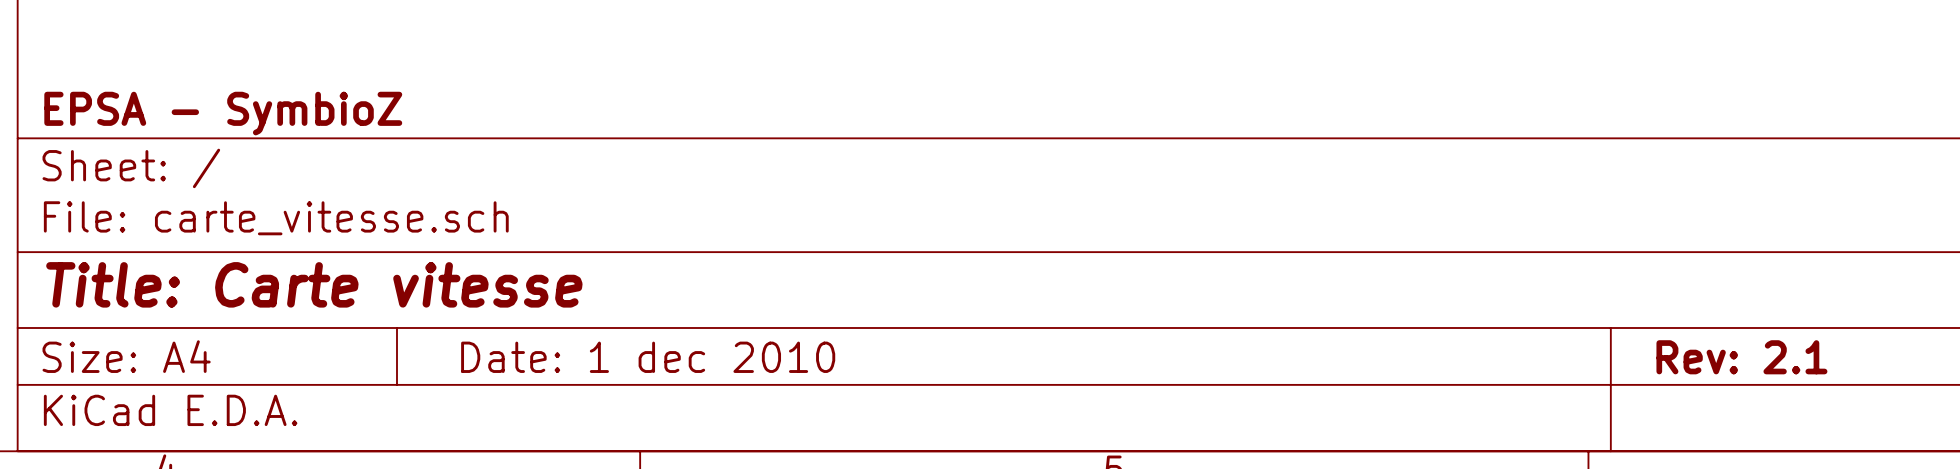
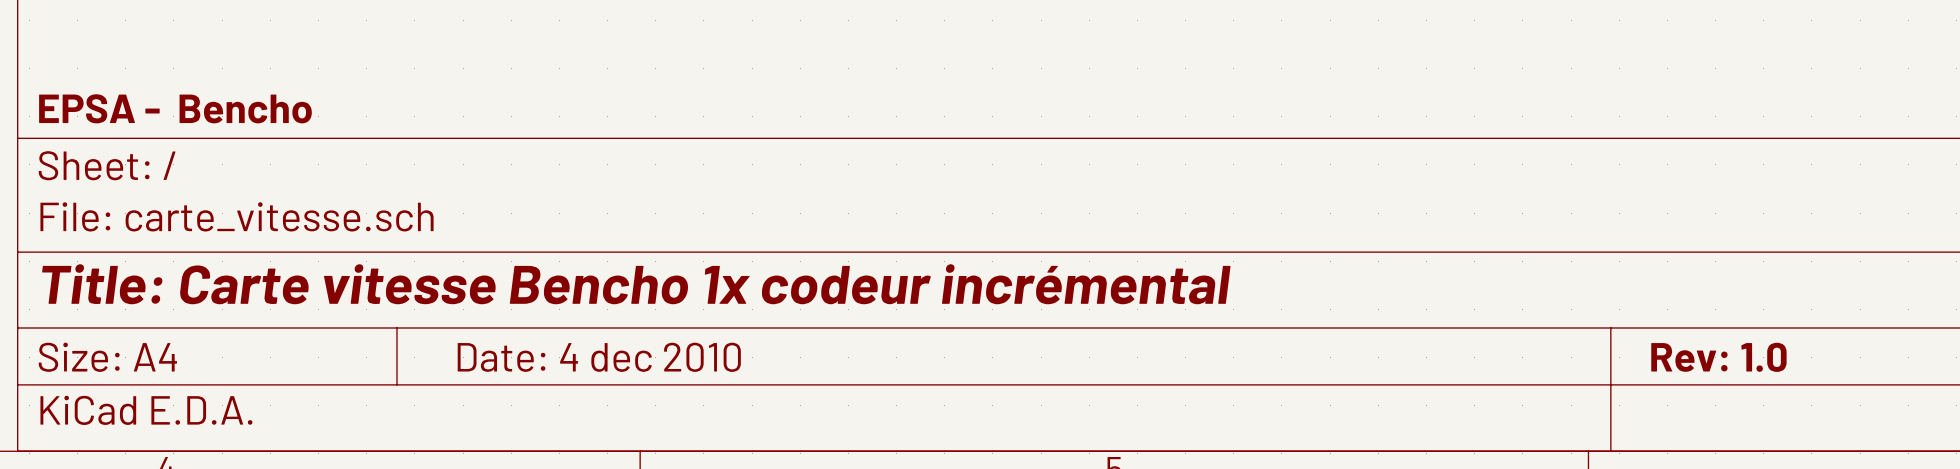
title block: EPSA - SymbioZ (223, 113) -> EPSA - Bencho (175, 108)
title block: Title: Carte vitesse (314, 284) -> Title: Carte vitesse Bencho 1x codeur incrémental (636, 284)
title block: Date: 1 dec 2010 (648, 357) -> Date: 4 dec 2010 (599, 357)
title block: Rev: 2.1 (1741, 357) -> Rev: 1.0 (1718, 357)

